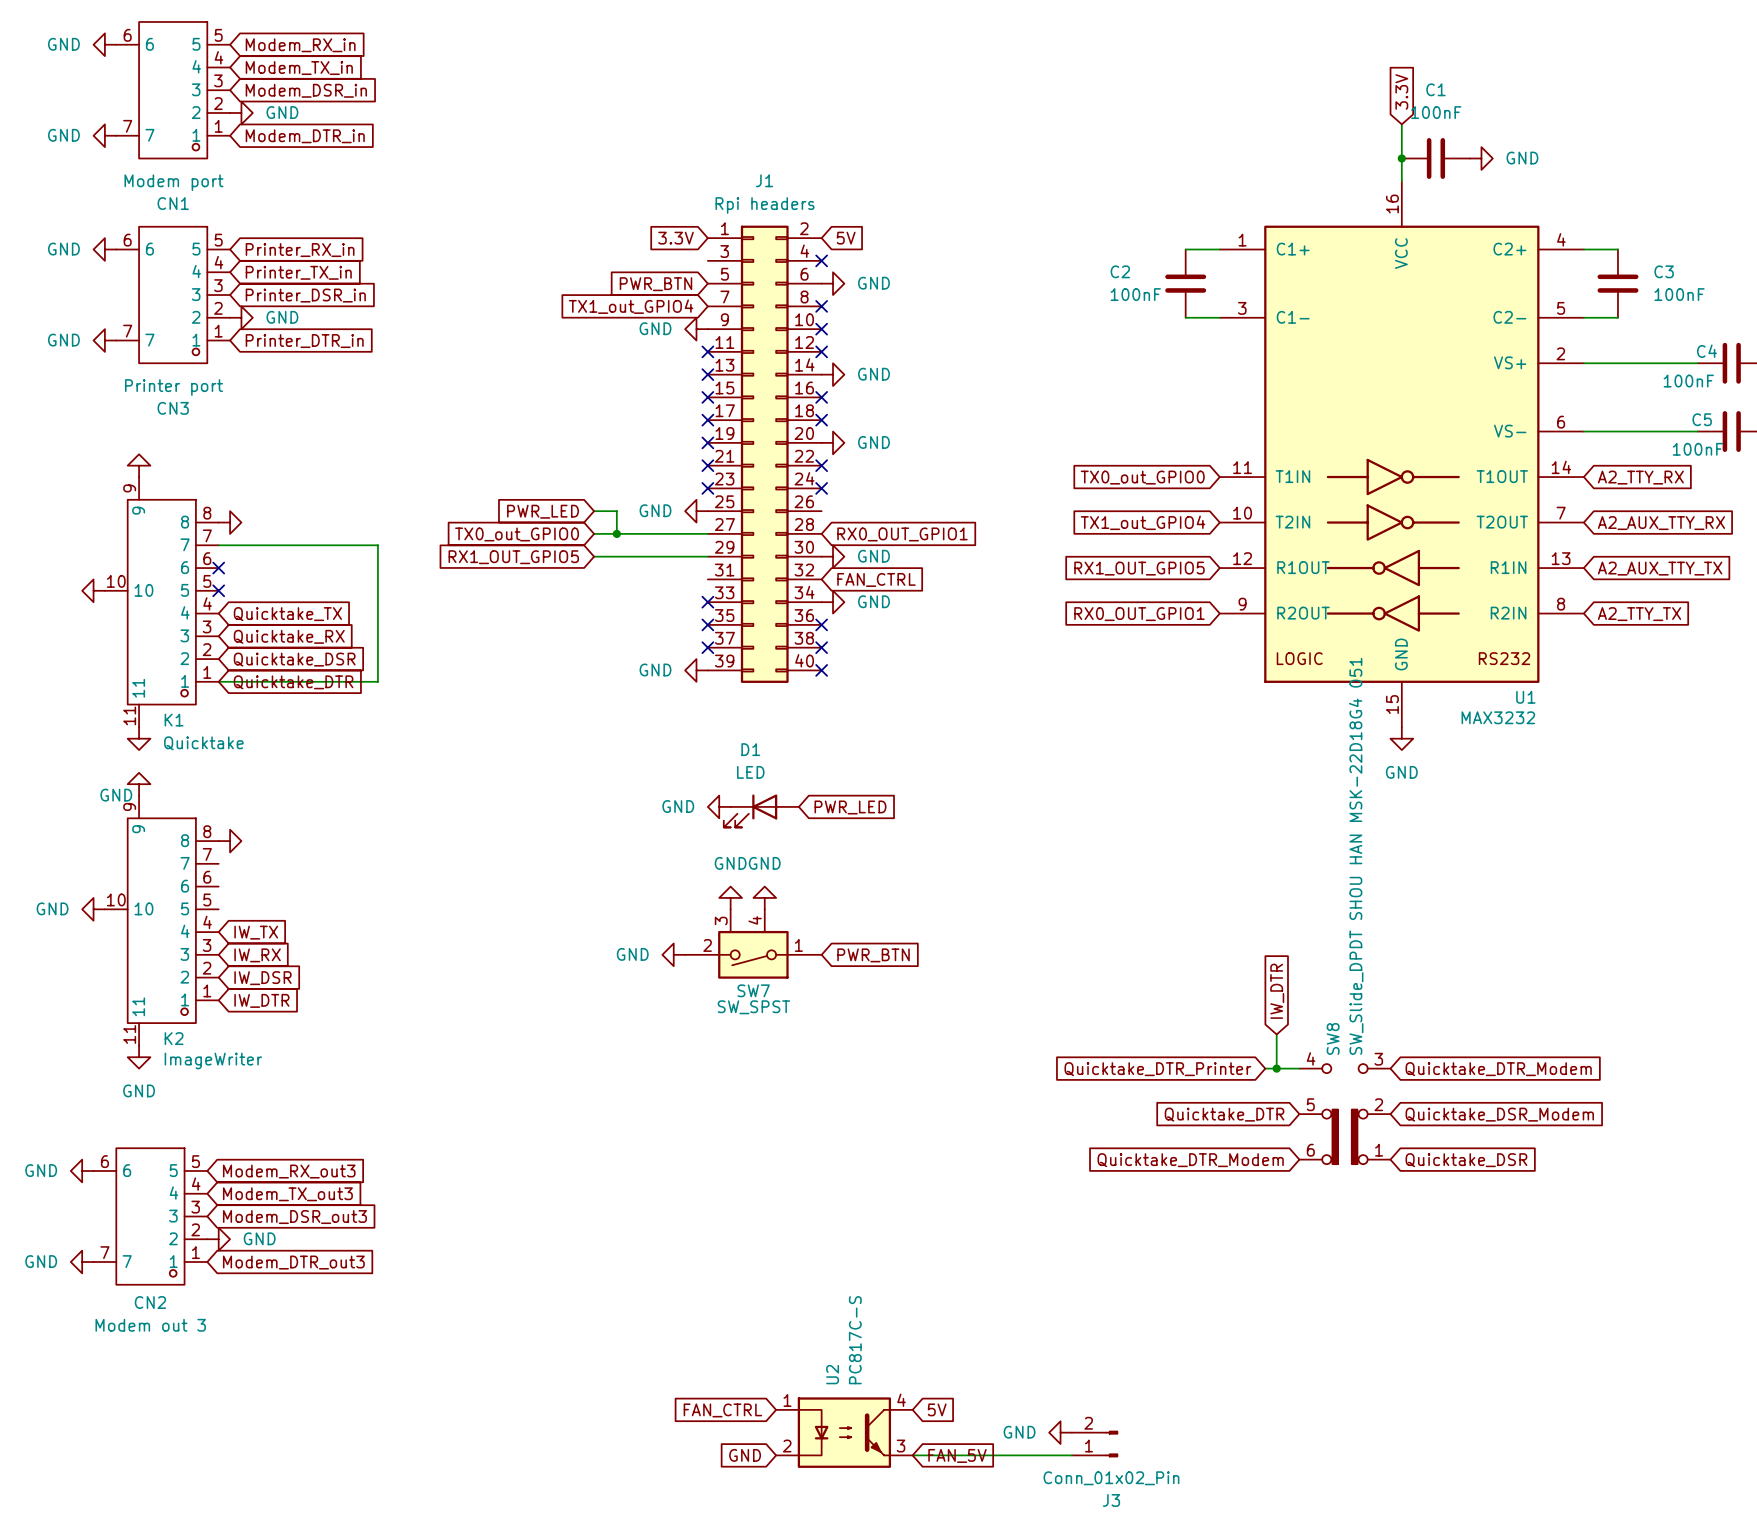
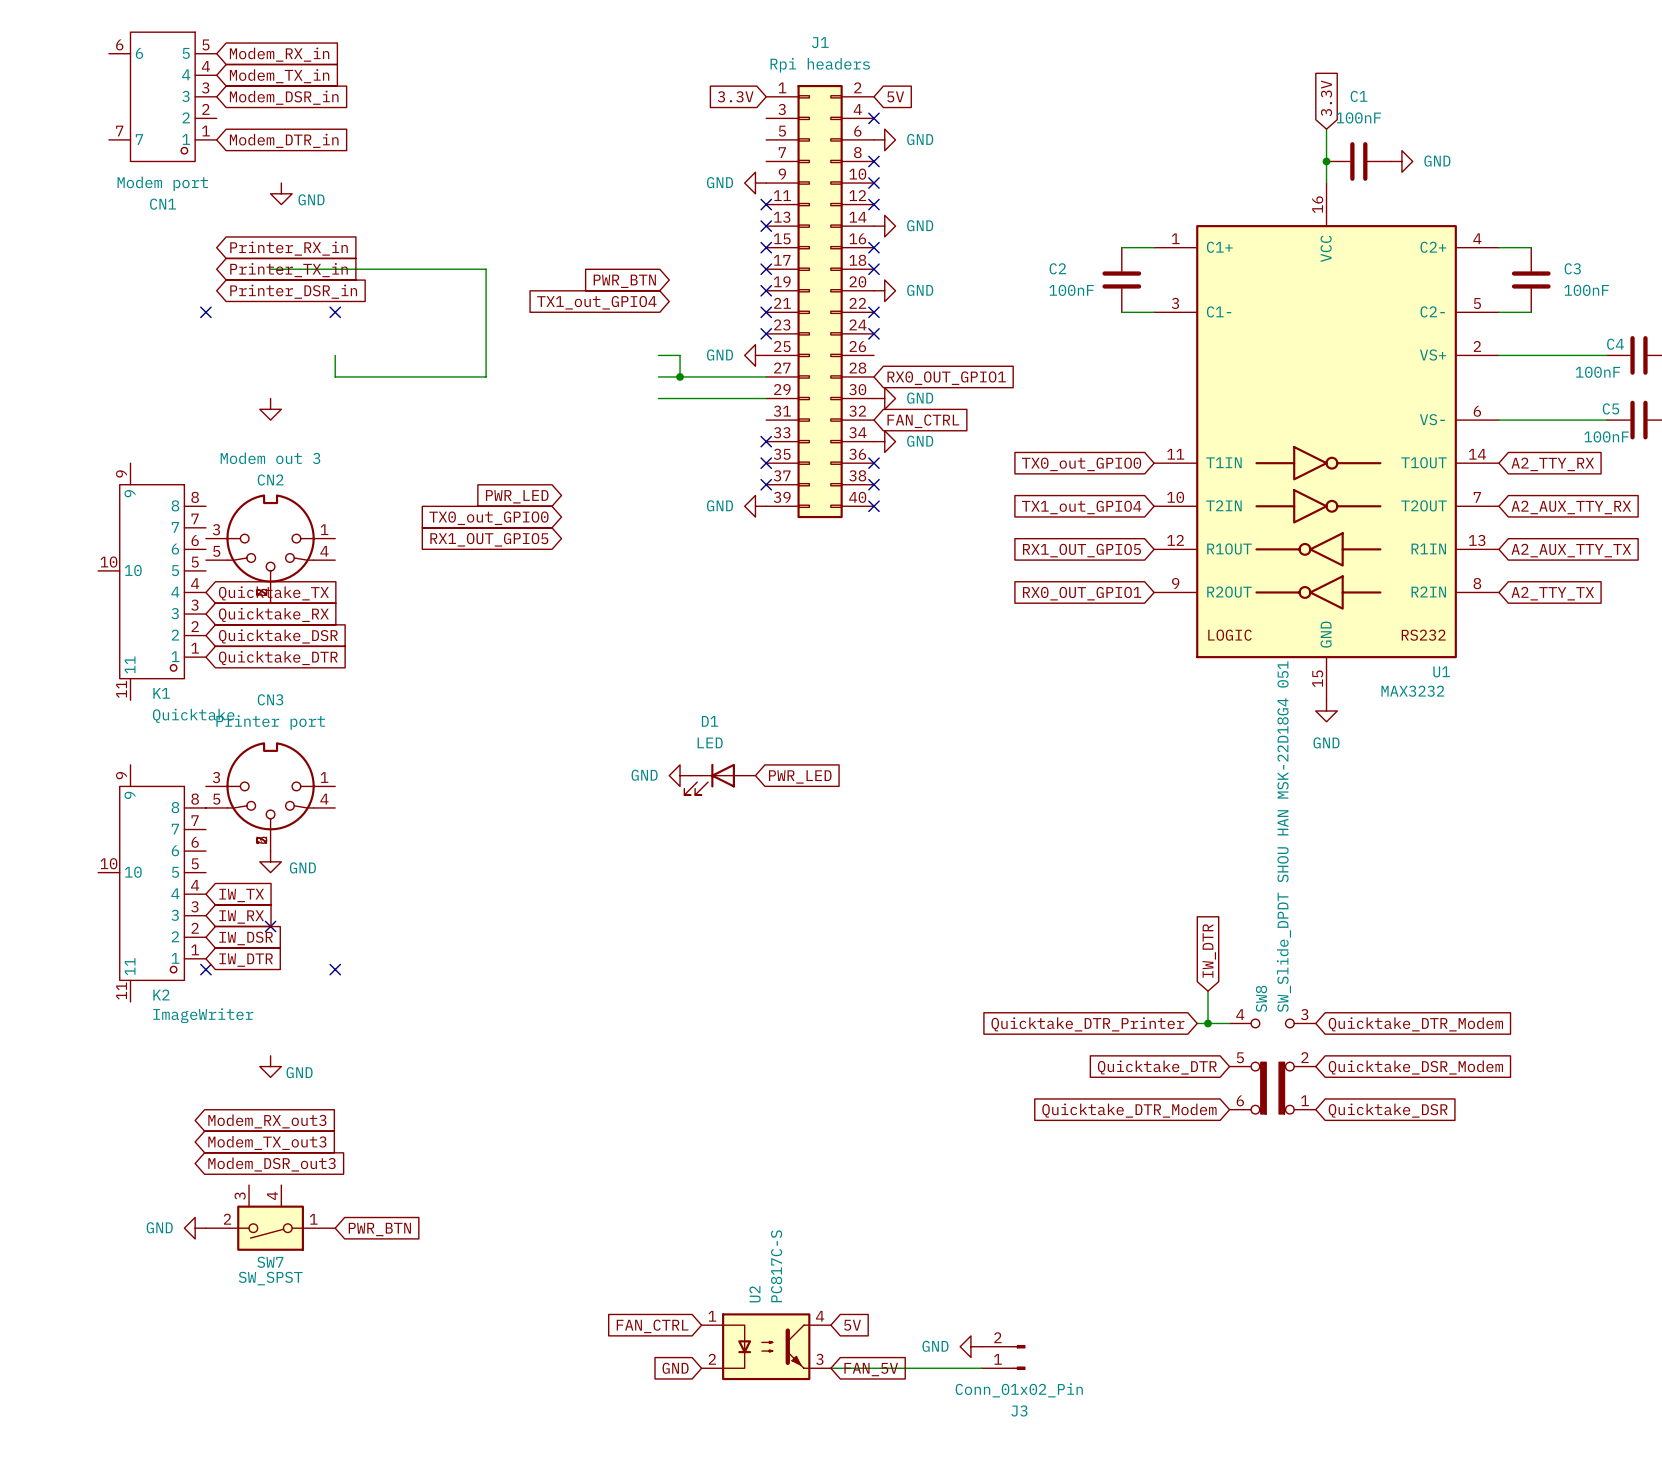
power symbol: GND (104, 44) -> none
power symbol: GND (241, 112) -> none
no-connect mark: none -> (873, 118)
power symbol: GND (104, 135) -> none
power symbol: none -> GND (884, 139)
no-connect mark: none -> (873, 161)
power symbol: none -> GND (755, 183)
no-connect mark: none -> (873, 183)
power symbol: none -> GND (281, 193)
no-connect mark: none -> (766, 204)
no-connect mark: none -> (873, 204)
CN3 symbol: [116, 226, 231, 364] -> [205, 742, 336, 852]
no-connect mark: none -> (766, 226)
power symbol: none -> GND (884, 226)
global label position: 3.3V (676, 238) -> 3.3V (735, 96)
global label position: 5V (846, 238) -> 5V (895, 96)
power symbol: GND (104, 249) -> none
no-connect mark: none -> (766, 247)
no-connect mark: none -> (873, 247)
no-connect mark: (821, 260) -> none
wire: none -> (270, 269) (486, 269) (486, 376) (335, 376) (335, 355)
no-connect mark: none -> (766, 269)
no-connect mark: none -> (873, 269)
power symbol: GND (833, 283) -> none
no-connect mark: none -> (766, 290)
power symbol: none -> GND (884, 290)
no-connect mark: (821, 306) -> none
no-connect mark: none -> (205, 312)
power symbol: GND (241, 317) -> none
no-connect mark: none -> (335, 312)
no-connect mark: none -> (766, 312)
no-connect mark: none -> (873, 312)
power symbol: GND (696, 329) -> none
no-connect mark: (821, 329) -> none
power symbol: GND (104, 340) -> none
no-connect mark: none -> (766, 333)
no-connect mark: none -> (873, 333)
global label: Printer_DTR_in (304, 341) -> none
no-connect mark: (707, 351) -> none
no-connect mark: (821, 351) -> none
no-connect mark: (707, 374) -> none
power symbol rotation: 0° (833, 374) -> 180° (755, 355)
power symbol position: GND (833, 374) -> GND (755, 355)
junction: none -> (680, 376)
CN3 value position: Printer port (173, 387) -> Printer port (270, 722)
no-connect mark: (707, 397) -> none
no-connect mark: (821, 397) -> none
CN3 name position: CN3 (173, 408) -> CN3 (270, 699)
power symbol: none -> GND (884, 398)
power symbol: none -> (270, 409)
no-connect mark: (707, 420) -> none
no-connect mark: (821, 420) -> none
no-connect mark: (707, 442) -> none
power symbol: GND (833, 442) -> none
J1 position: (764, 454) -> (820, 301)
no-connect mark: none -> (766, 441)
power symbol: none -> GND (884, 441)
power symbol: (139, 465) -> none
no-connect mark: (707, 465) -> none
no-connect mark: (821, 465) -> none
no-connect mark: none -> (766, 463)
no-connect mark: none -> (873, 463)
no-connect mark: (707, 488) -> none
no-connect mark: (821, 488) -> none
no-connect mark: none -> (766, 484)
no-connect mark: none -> (873, 484)
wire: (594, 511) (616, 511) (616, 533) -> (658, 355) (680, 355) (680, 376)
power symbol: GND (696, 511) -> none
power symbol: (230, 522) -> none
power symbol: none -> GND (755, 506)
no-connect mark: none -> (873, 506)
wire: (594, 533) (707, 533) -> (658, 376) (766, 376)
junction: (616, 533) -> none
global label position: RX0_OUT_GPIO1 (902, 534) -> RX0_OUT_GPIO1 (946, 378)
wire: (218, 545) (377, 545) (377, 681) (218, 681) -> none
wire: (594, 556) (707, 556) -> (658, 398) (766, 398)
power symbol: GND (833, 556) -> none
no-connect mark: (218, 568) -> none
global label position: FAN_CTRL (876, 579) -> FAN_CTRL (923, 421)
power symbol: (93, 590) -> none
no-connect mark: (218, 590) -> none
no-connect mark: (707, 602) -> none
power symbol: GND (833, 602) -> none
no-connect mark: (707, 624) -> none
no-connect mark: (821, 624) -> none
no-connect mark: (707, 647) -> none
no-connect mark: (821, 647) -> none
power symbol: GND (696, 670) -> none
no-connect mark: (821, 670) -> none
power symbol: (139, 738) -> none
power symbol: GND (139, 784) -> none
power symbol: (230, 841) -> none
power symbol: none -> GND (270, 861)
power symbol: GND (730, 897) -> none
power symbol: GND (764, 897) -> none
power symbol: GND (93, 909) -> none
SW7 position: (753, 944) -> (270, 1217)
power symbol: GND (673, 954) -> none
global label: PWR_BTN (873, 955) -> none
no-connect mark: none -> (270, 926)
no-connect mark: none -> (205, 969)
no-connect mark: none -> (335, 969)
power symbol: GND (139, 1057) -> none
power symbol: none -> GND (270, 1066)
CN2 symbol: [93, 1148, 208, 1285] -> [205, 494, 336, 604]
power symbol: GND (82, 1170) -> none
power symbol rotation: 0° (218, 1239) -> 180° (195, 1228)
power symbol position: GND (218, 1239) -> GND (195, 1228)
power symbol: GND (82, 1262) -> none
global label: Modem_DTR_out3 (293, 1262) -> none
global label: none -> PWR_BTN (379, 1229)
CN2 name position: CN2 (150, 1302) -> CN2 (270, 480)
CN2 value position: Modem out 3 (150, 1325) -> Modem out 3 (270, 458)
global label position: 5V (937, 1409) -> 5V (852, 1325)
global label position: FAN_CTRL (722, 1410) -> FAN_CTRL (652, 1326)
U2 position: (844, 1432) -> (766, 1346)
power symbol position: GND (1060, 1432) -> GND (970, 1346)
J3 position: (1095, 1444) -> (1003, 1357)
global label position: GND (745, 1455) -> GND (675, 1368)
wire: (912, 1455) (1071, 1455) -> (830, 1368) (981, 1368)
global label position: FAN_5V (957, 1455) -> FAN_5V (871, 1369)

